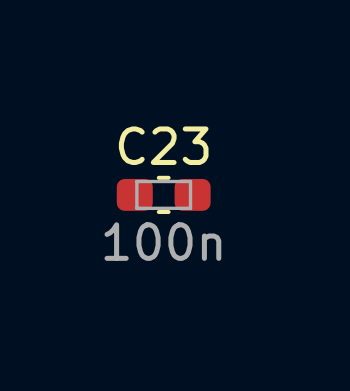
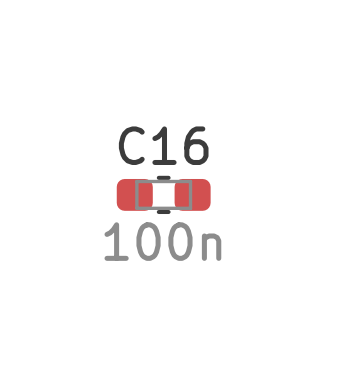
C23 name: C23 (163, 145) -> C16 (163, 145)

